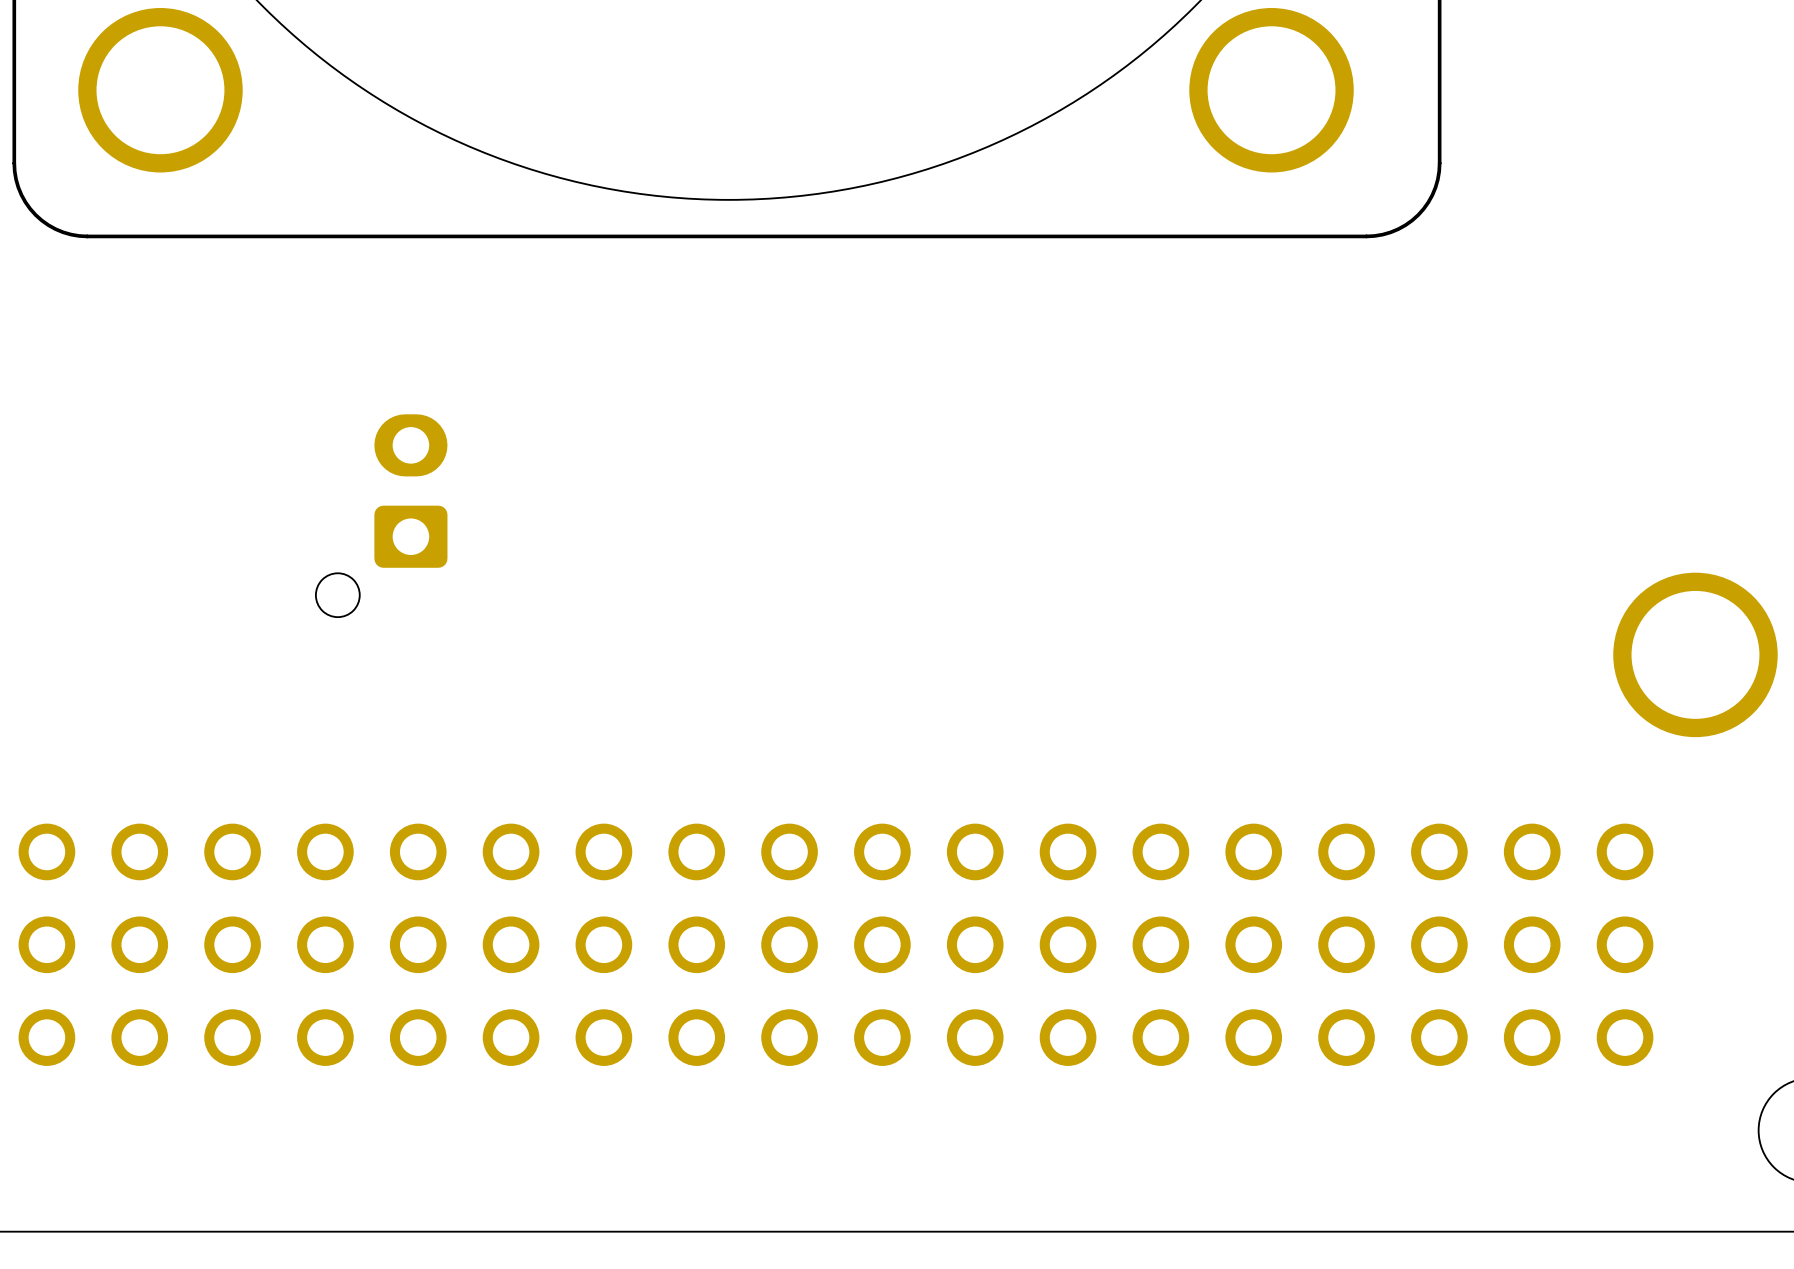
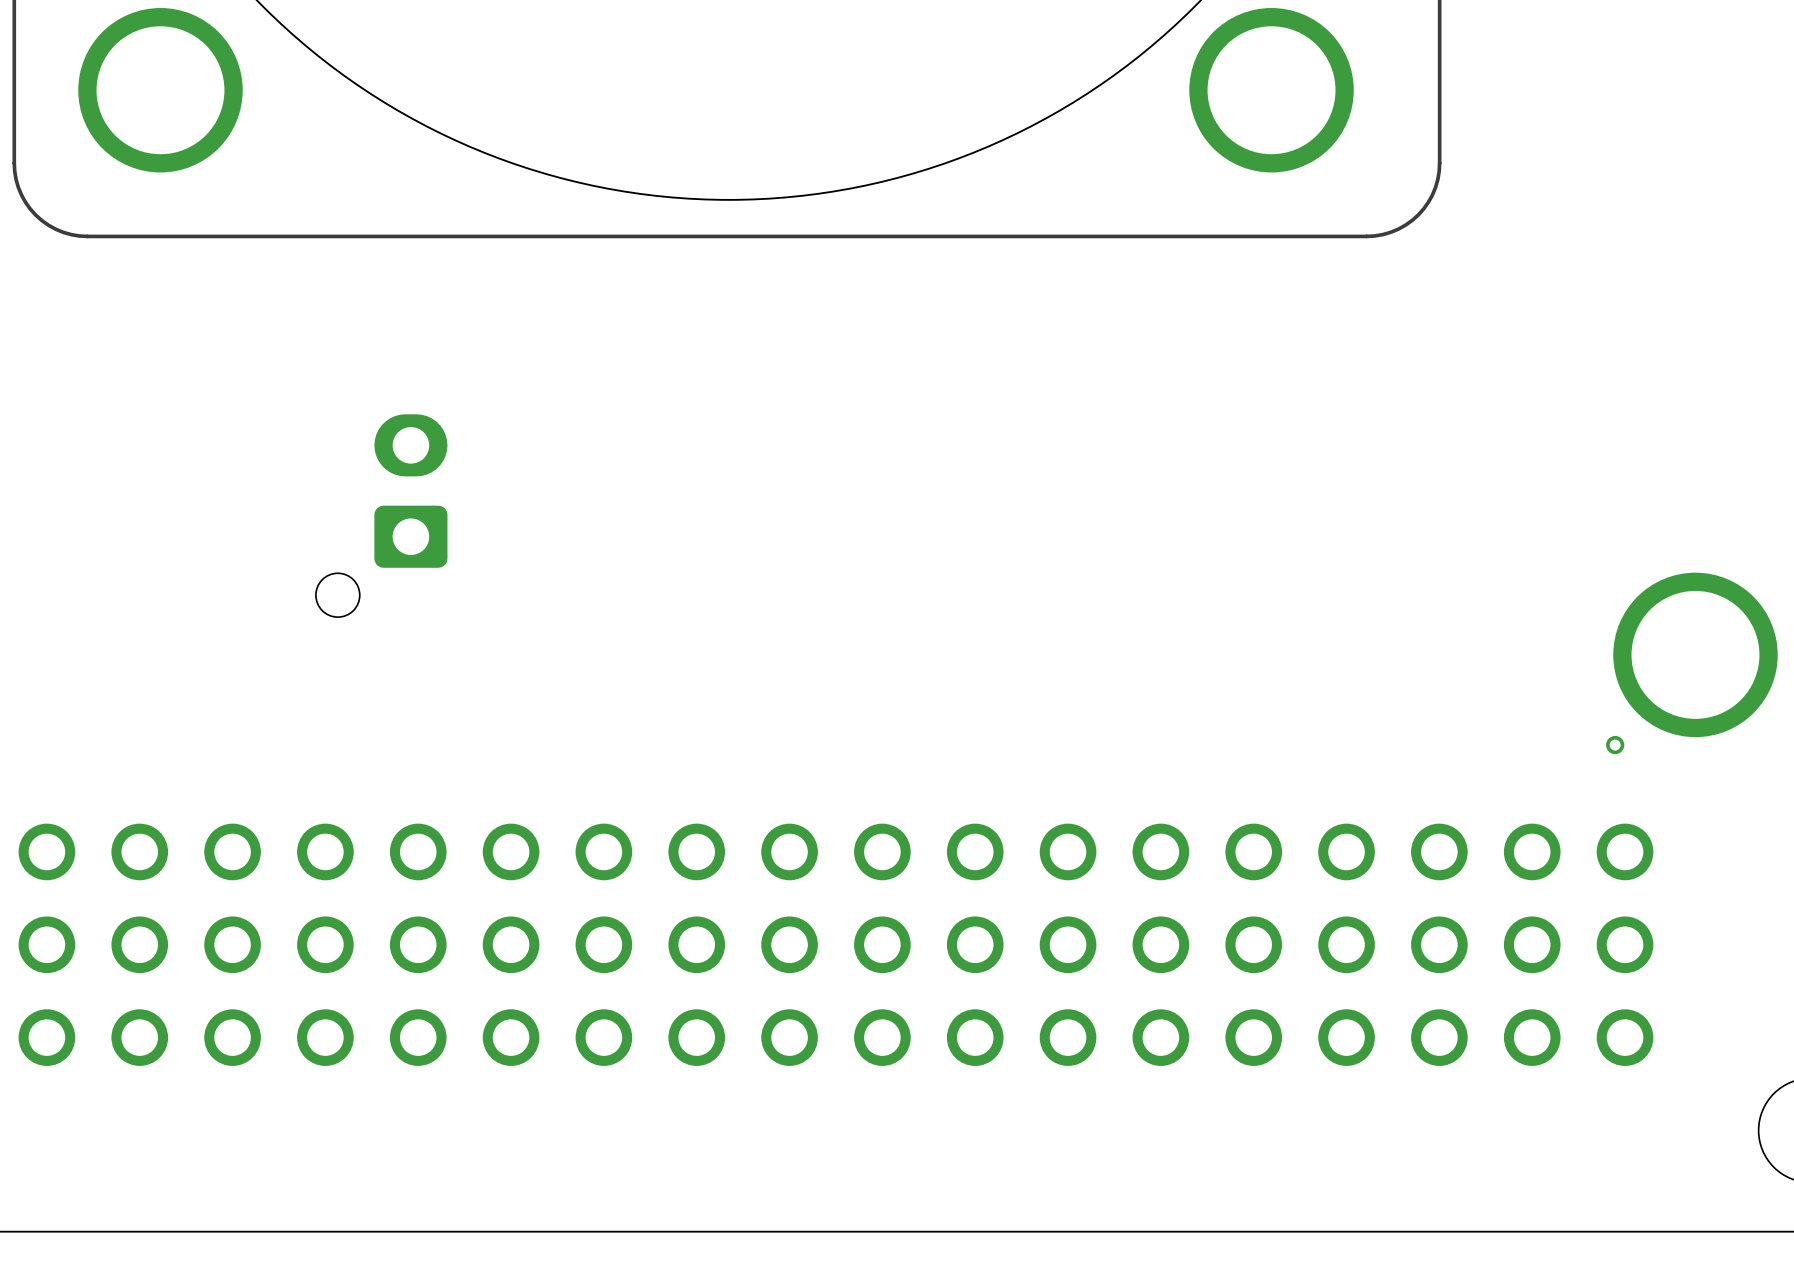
via: none -> (1615, 745)

